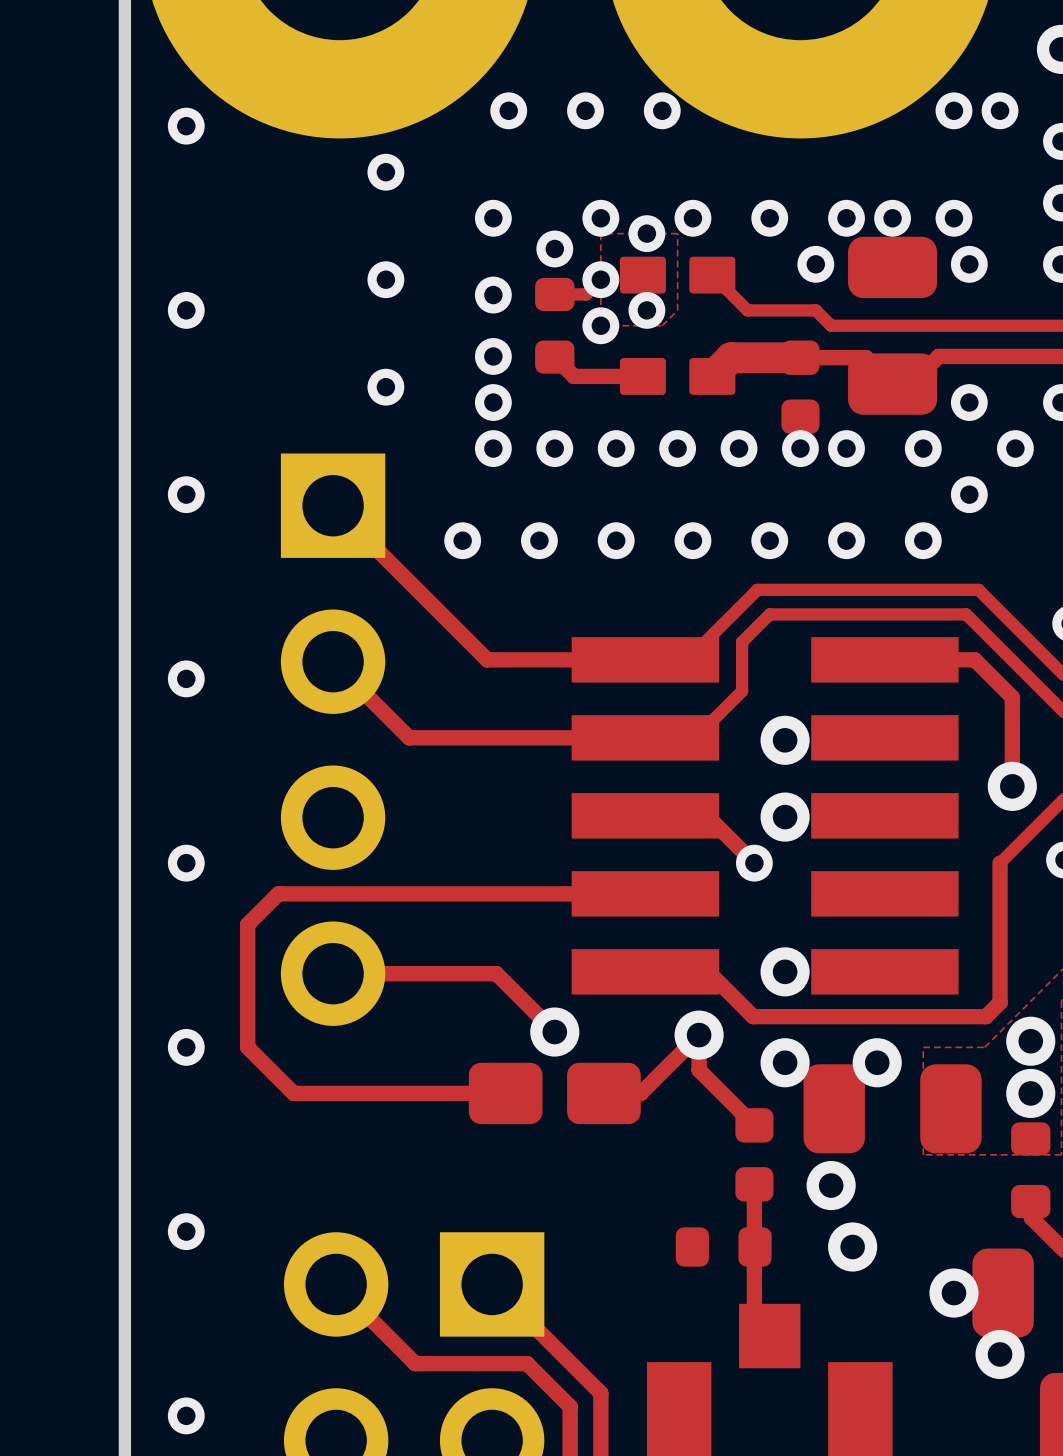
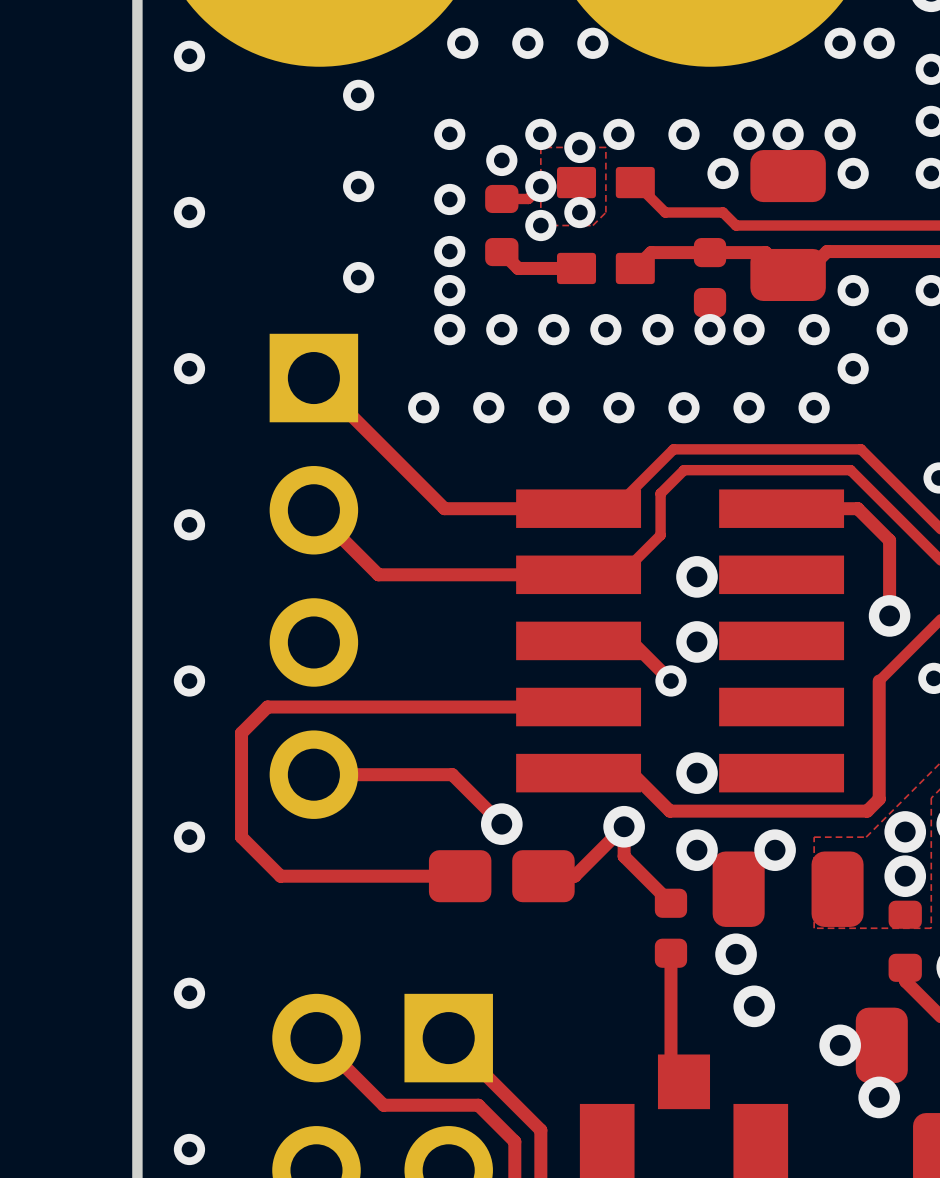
top track width: thick (800, 357) (731, 357) (712, 376) -> thin (710, 252) (651, 252) (635, 268)
part: (723, 1246) -> none

